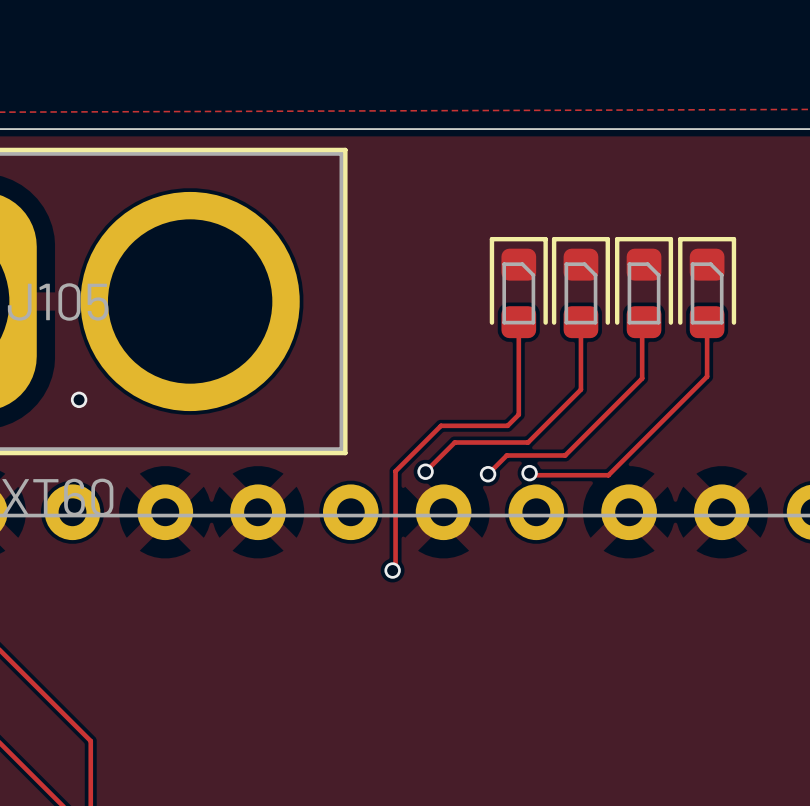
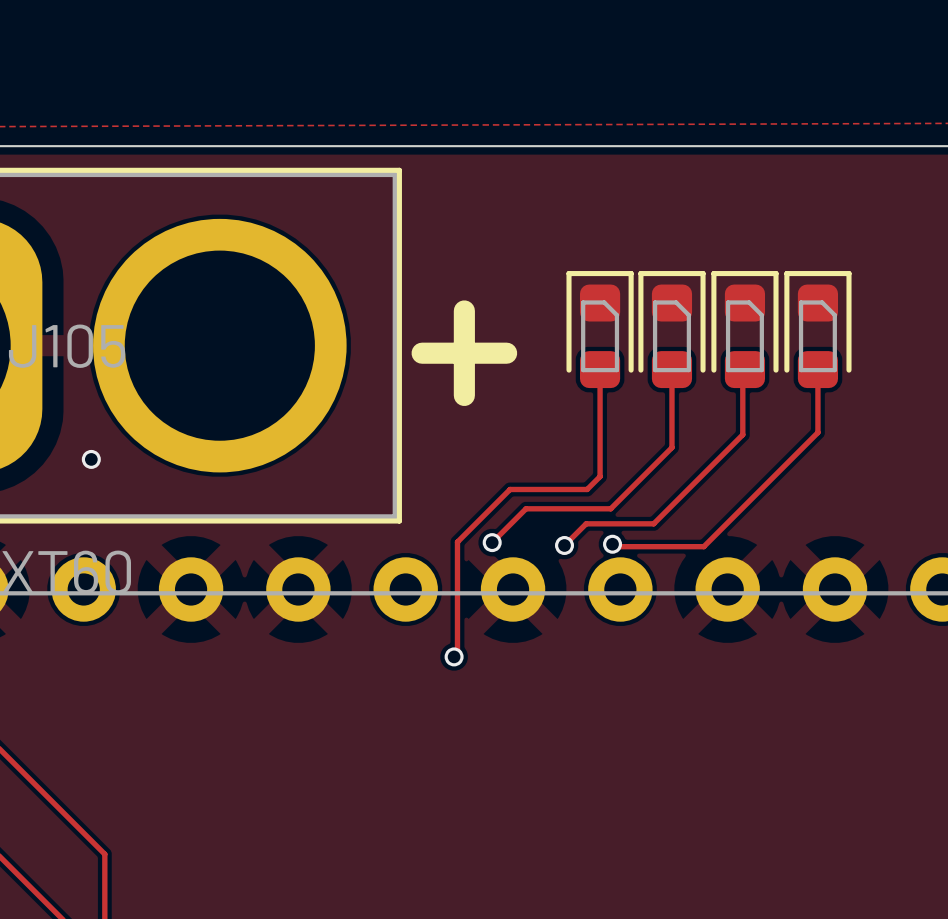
line: none -> (464, 310) (464, 395)
line: none -> (422, 353) (506, 353)

